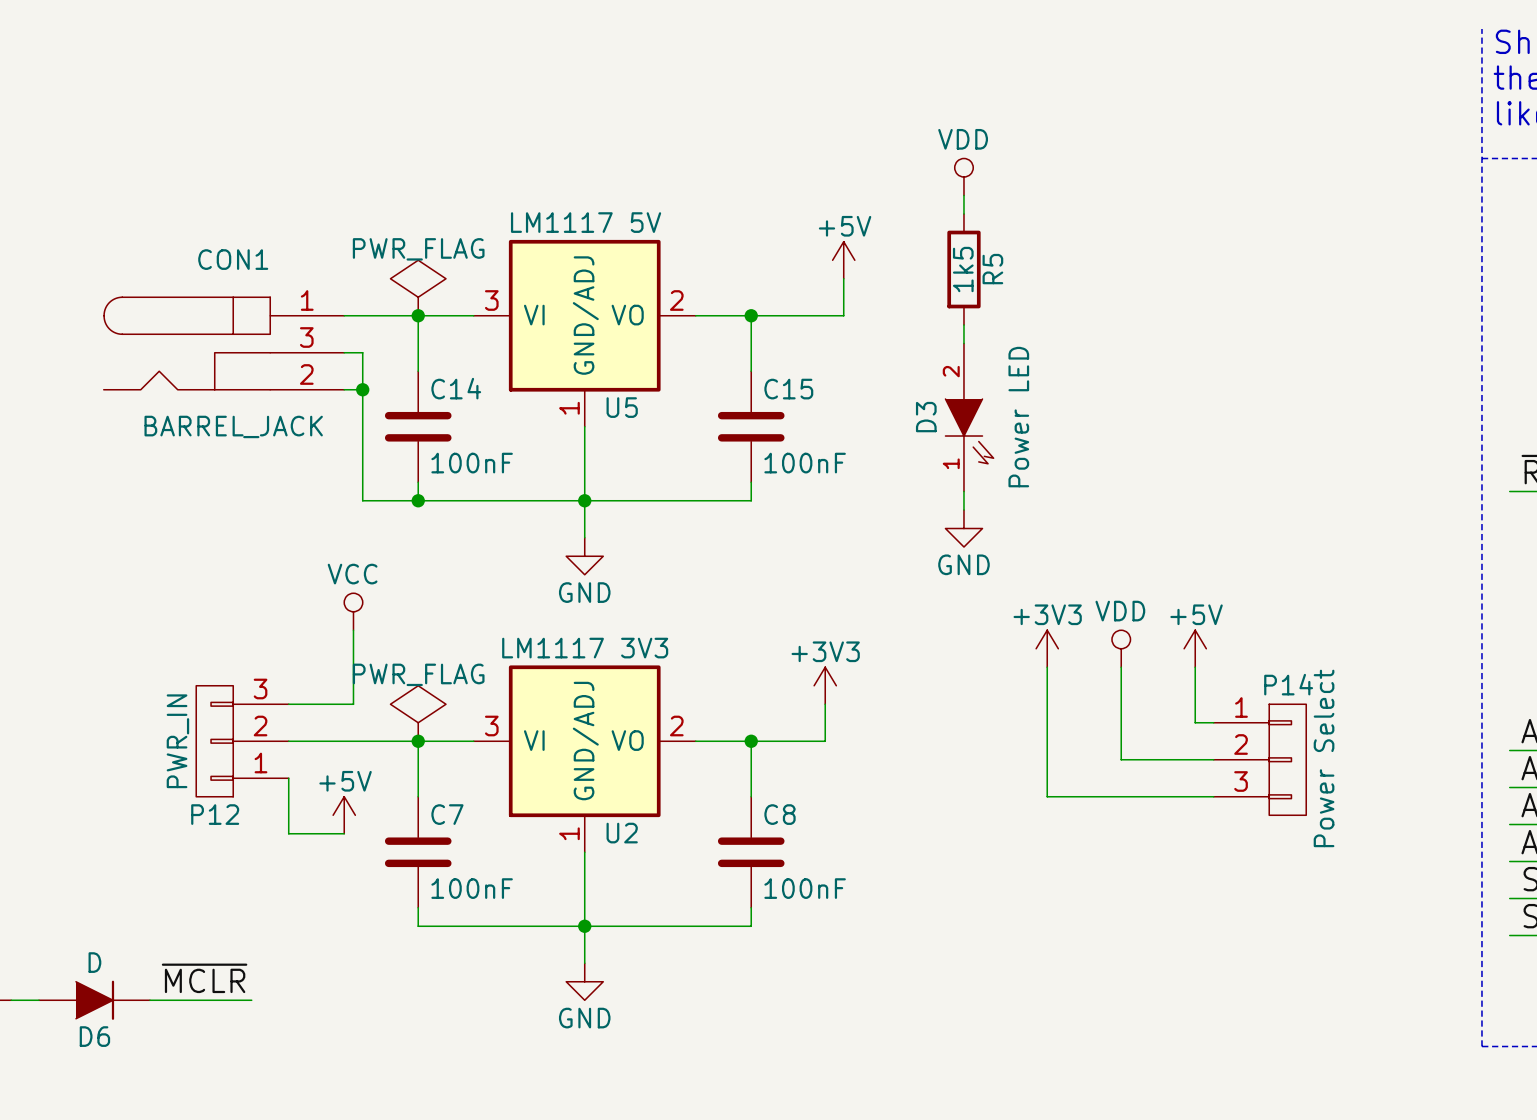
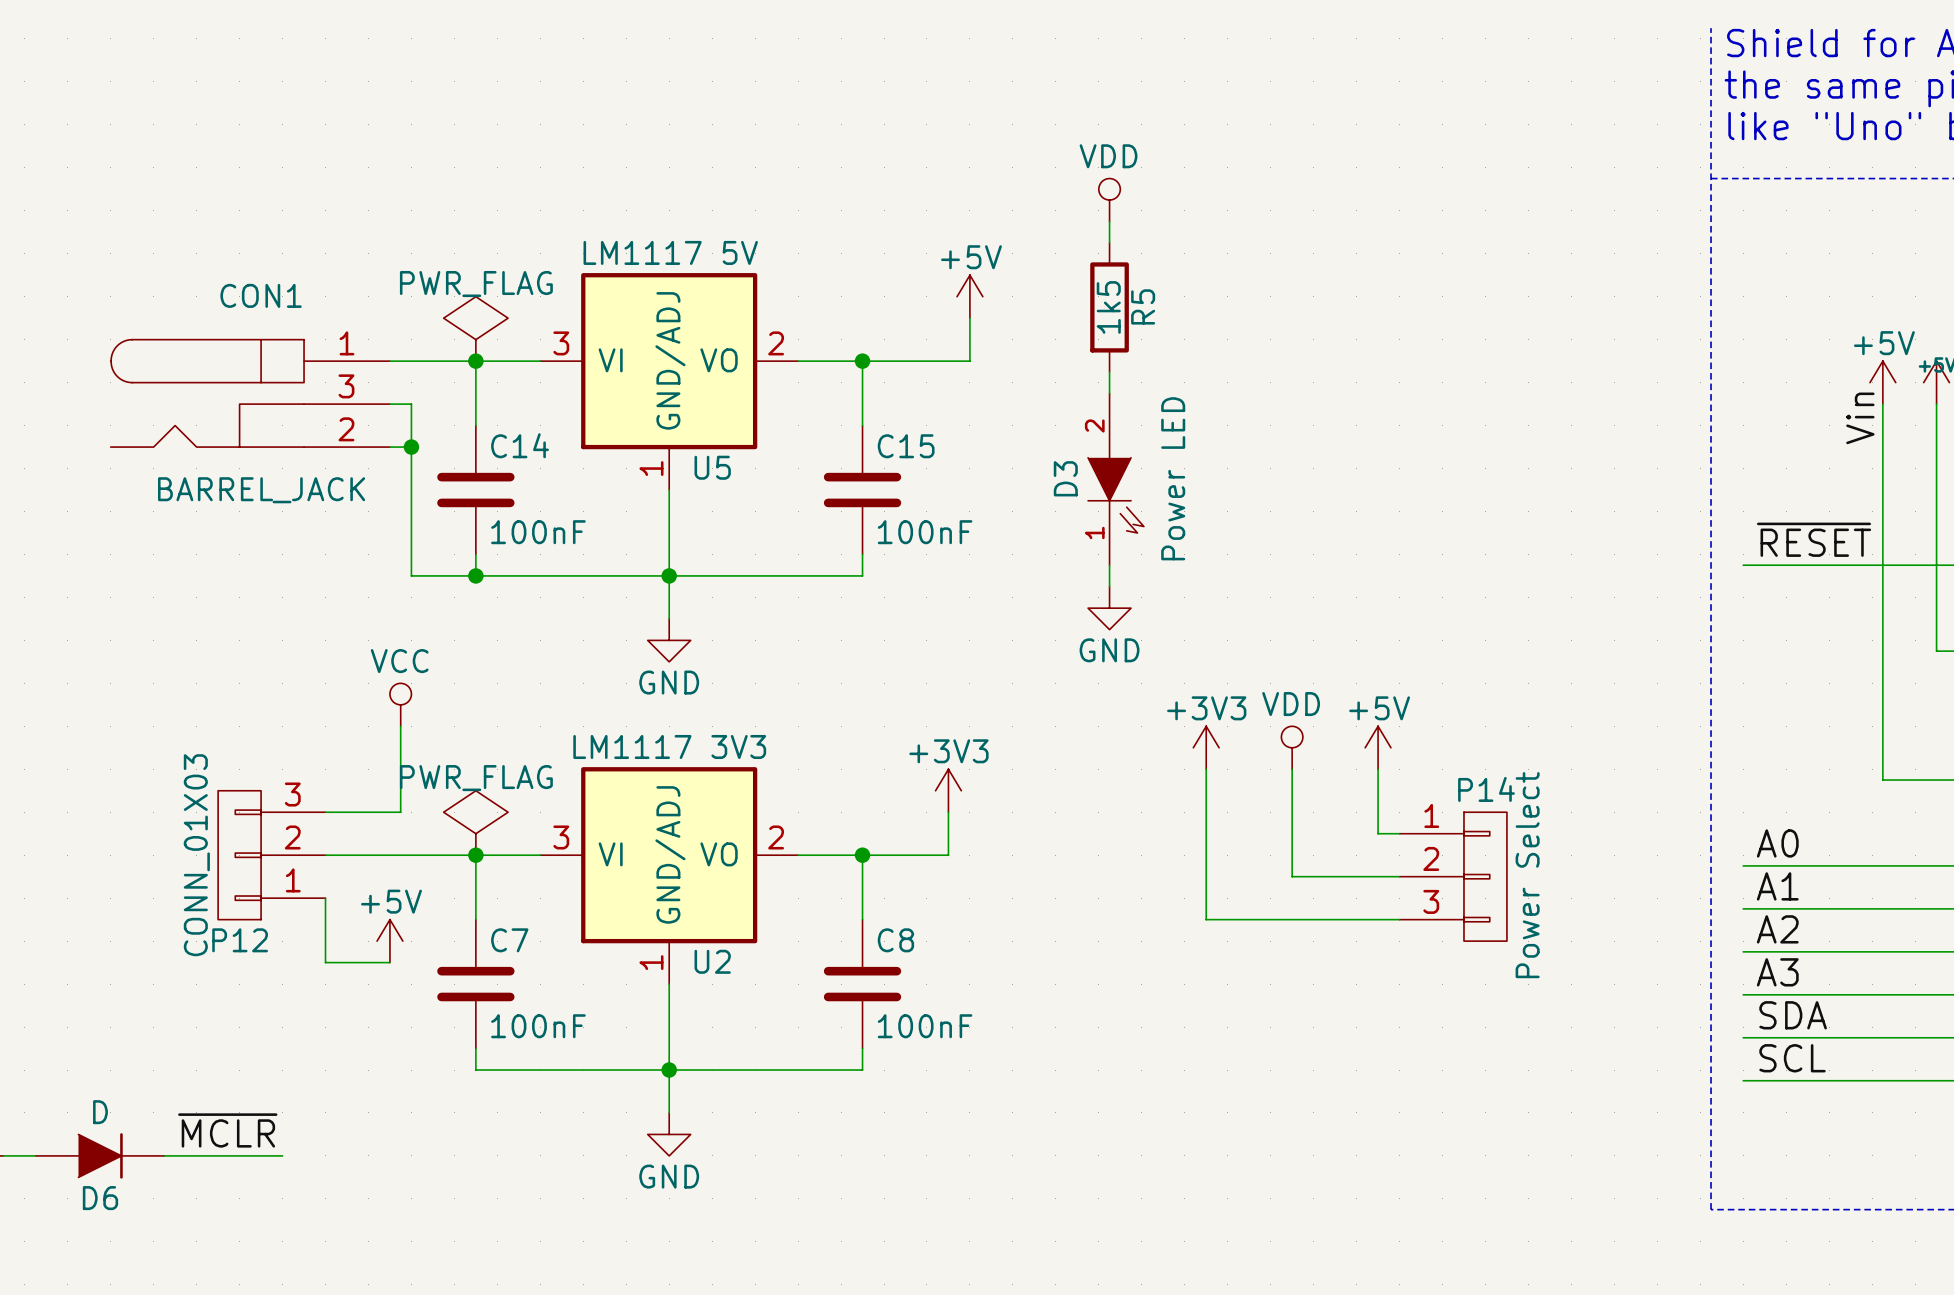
P12 value: PWR_IN (177, 741) -> CONN_01X03 (196, 855)

